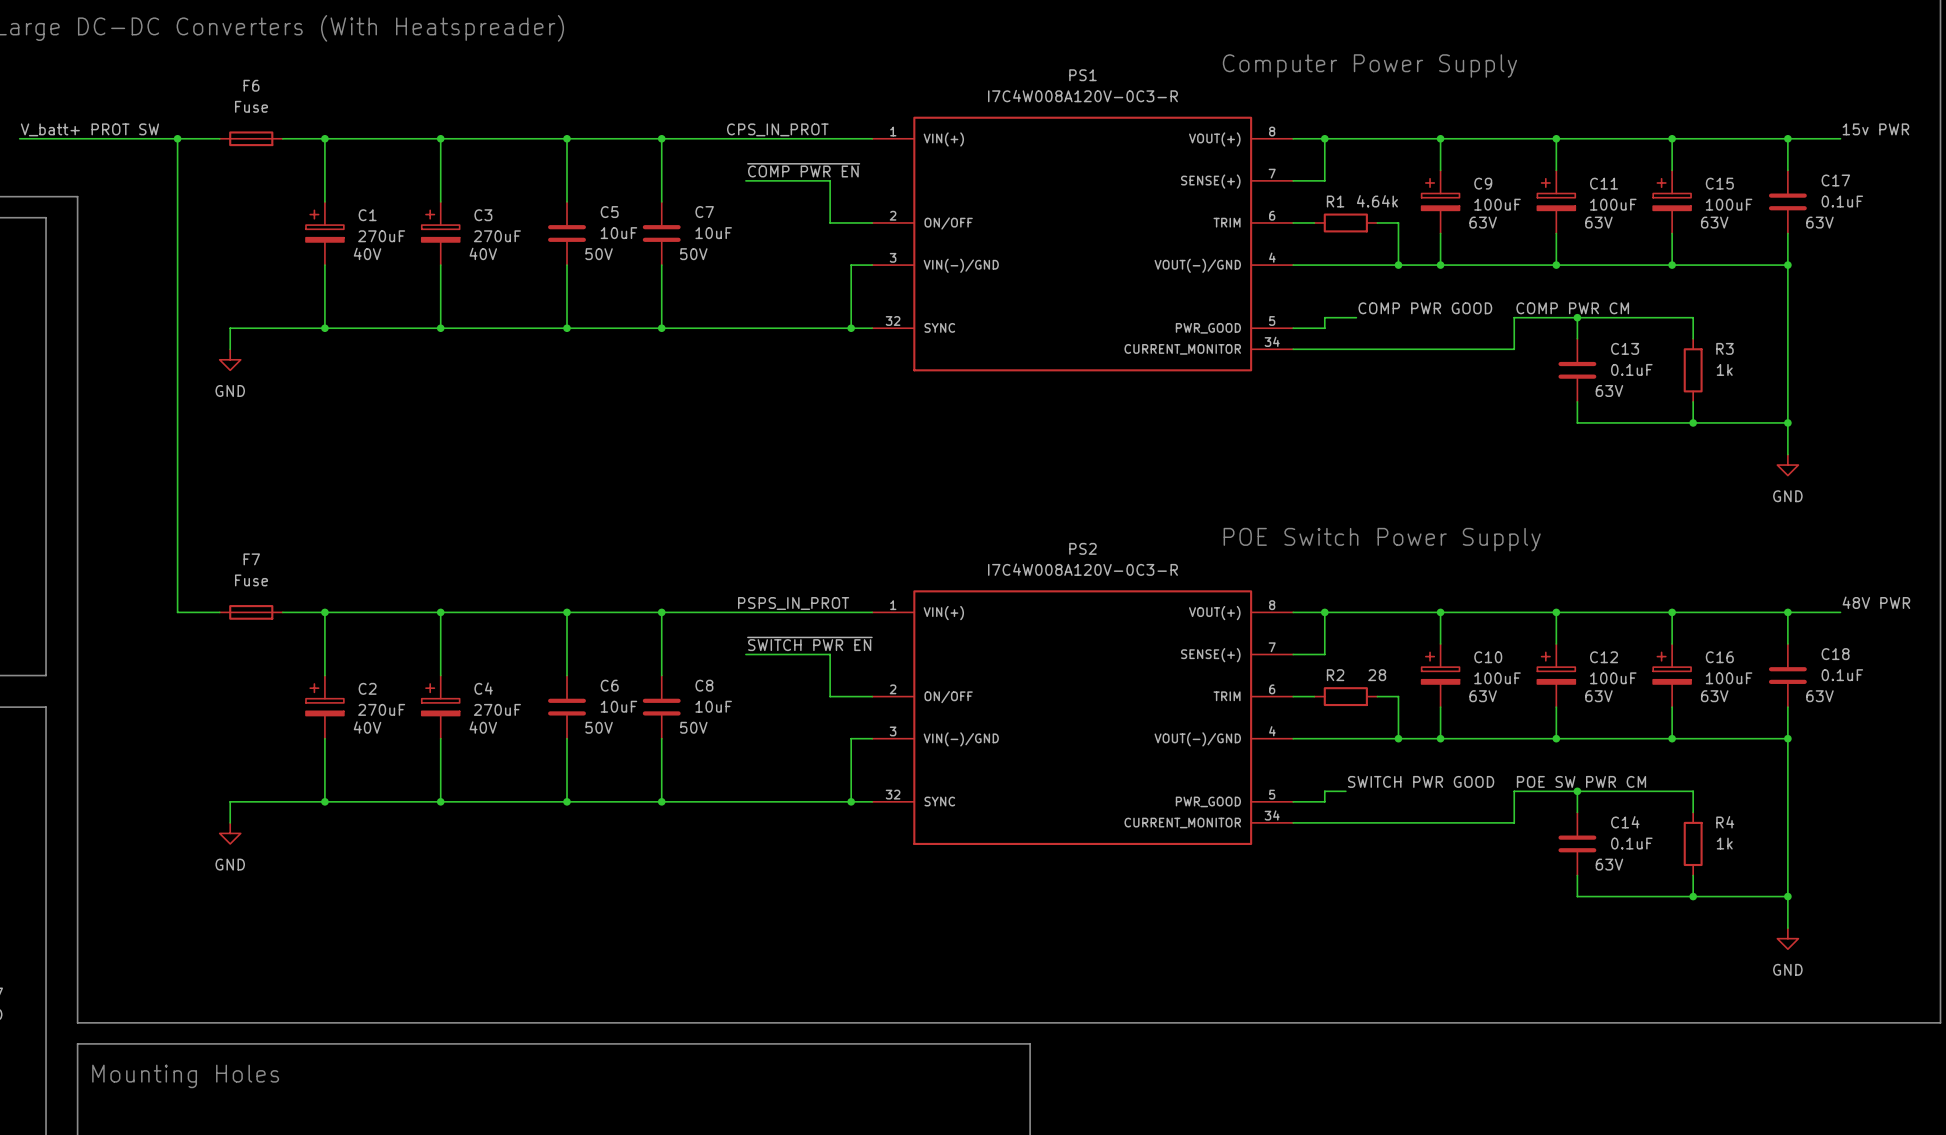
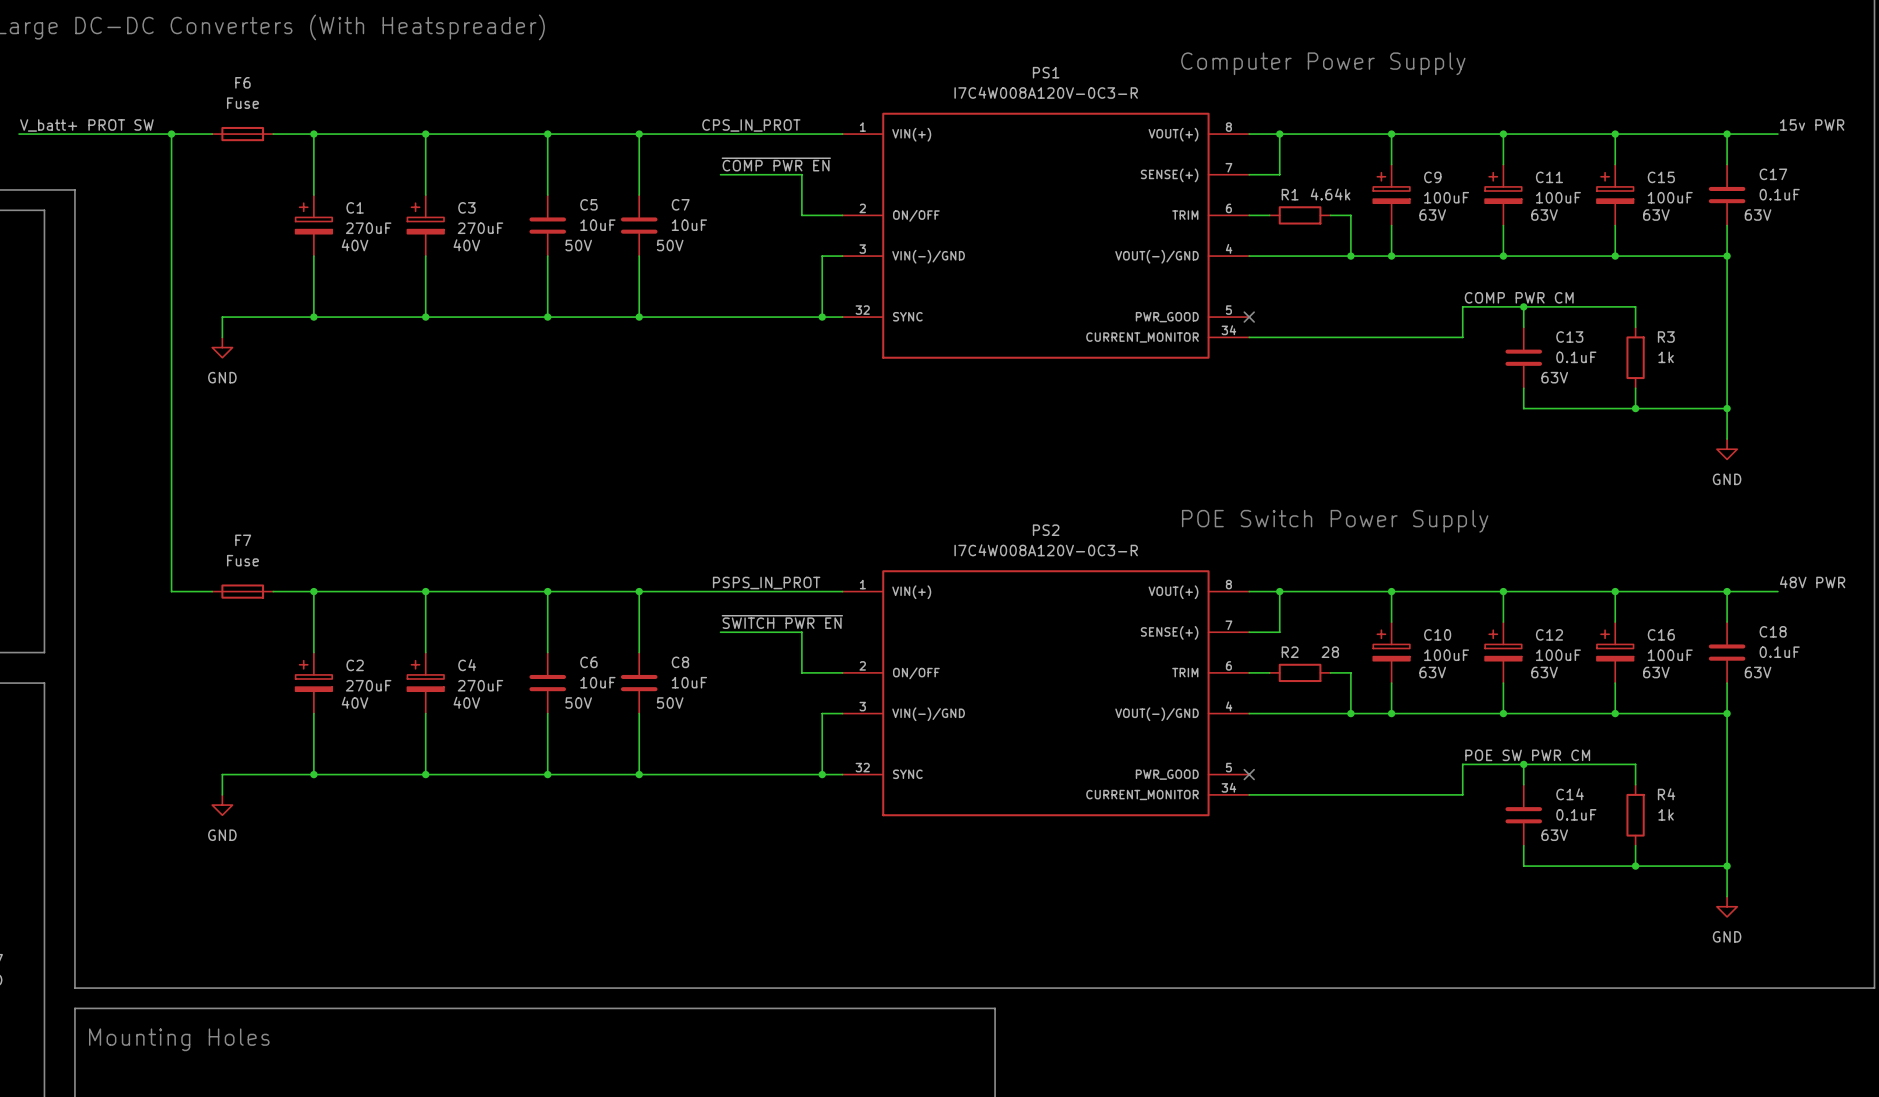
label: COMP PWR GOOD (1425, 308) -> none
wire: (1356, 317) (1324, 317) (1324, 328) (1293, 328) -> none
no-connect mark: none -> (1249, 317)
label: SWITCH PWR GOOD (1421, 781) -> none
wire: (1345, 791) (1324, 791) (1324, 801) (1293, 801) -> none
no-connect mark: none -> (1249, 774)

